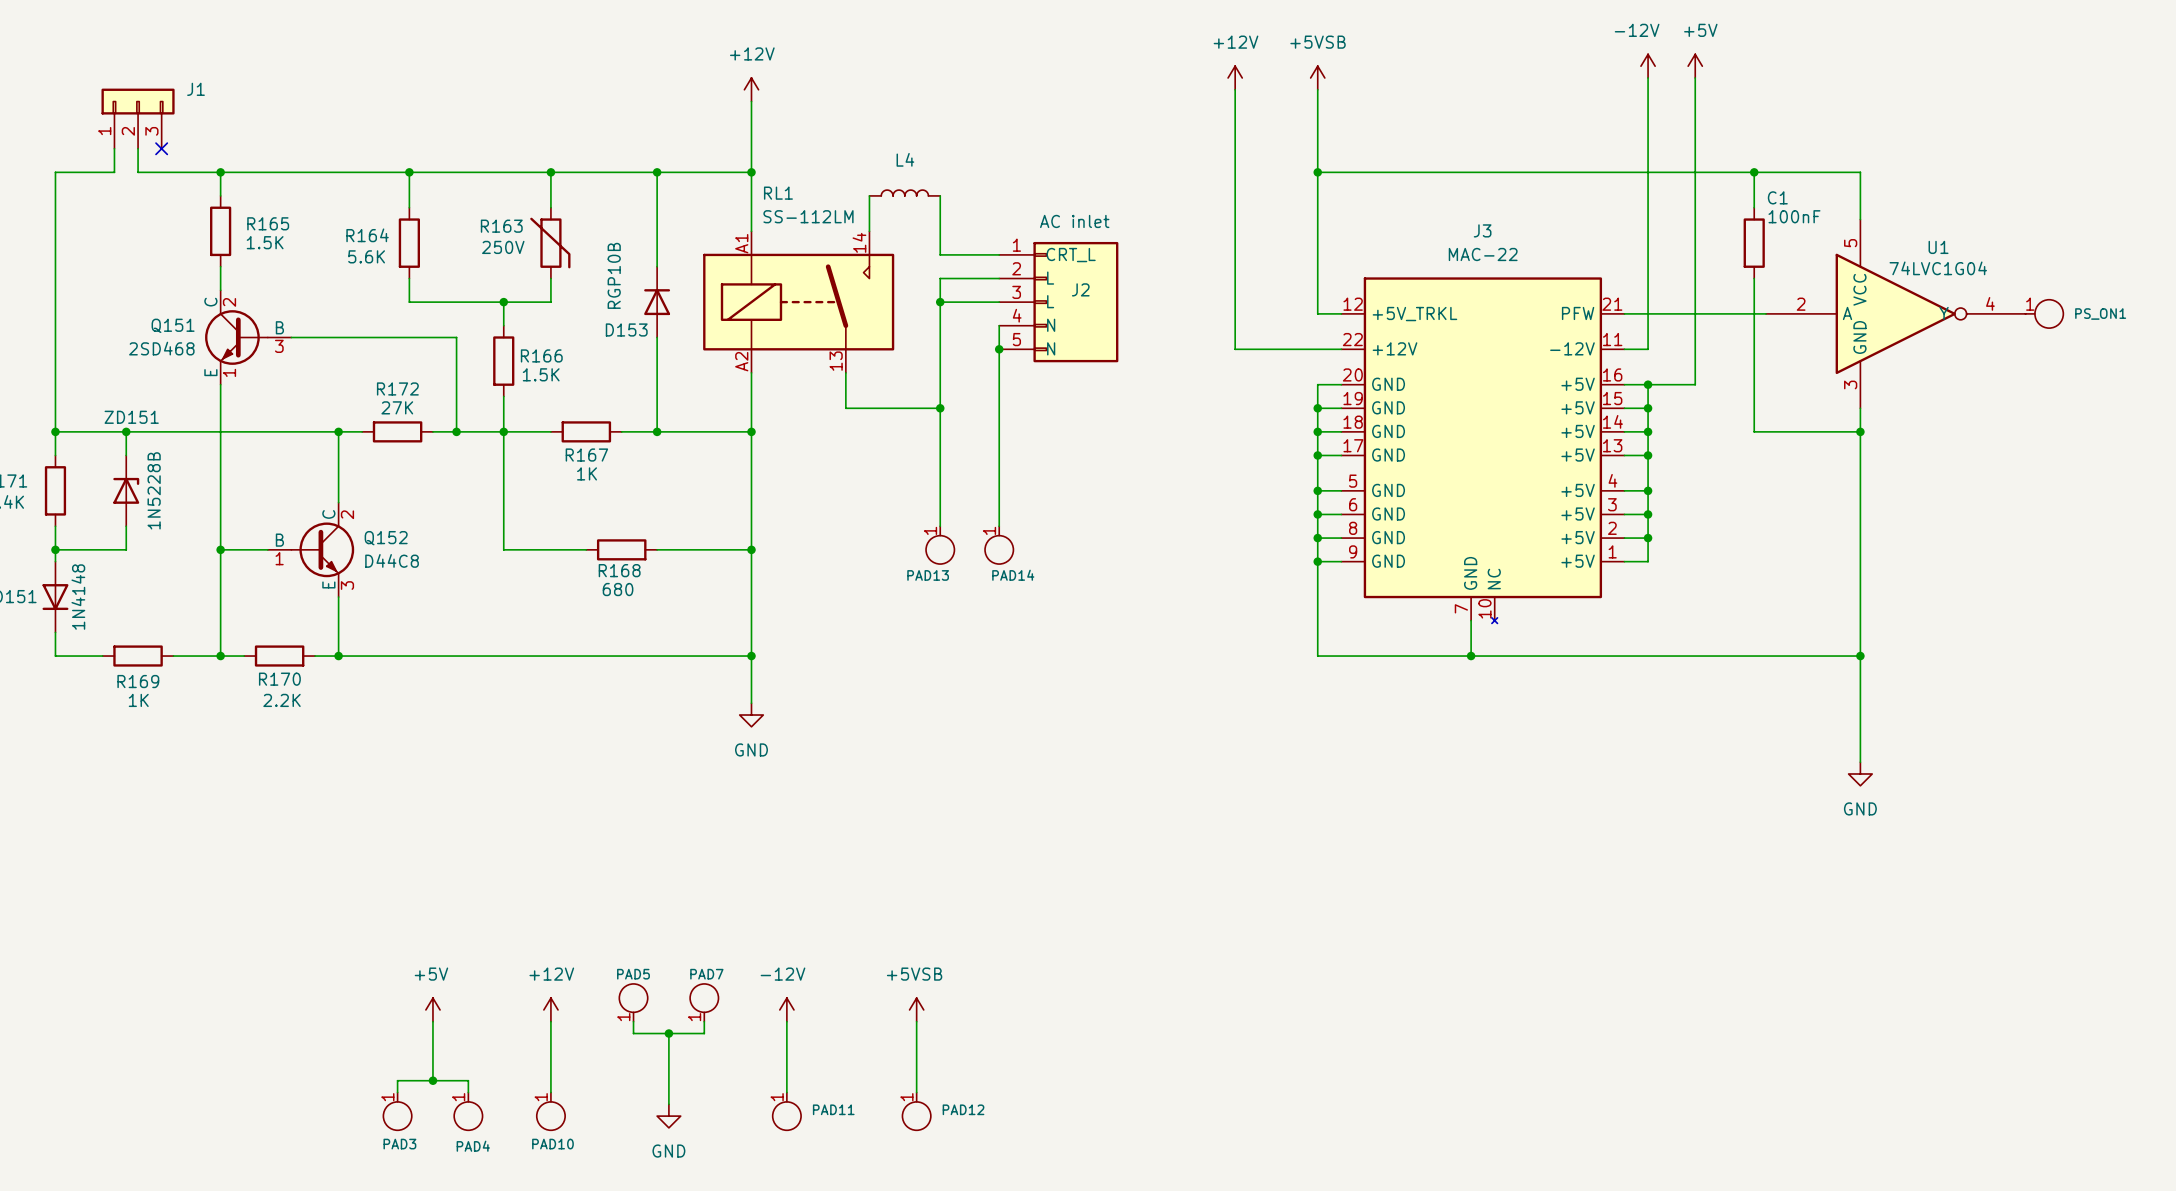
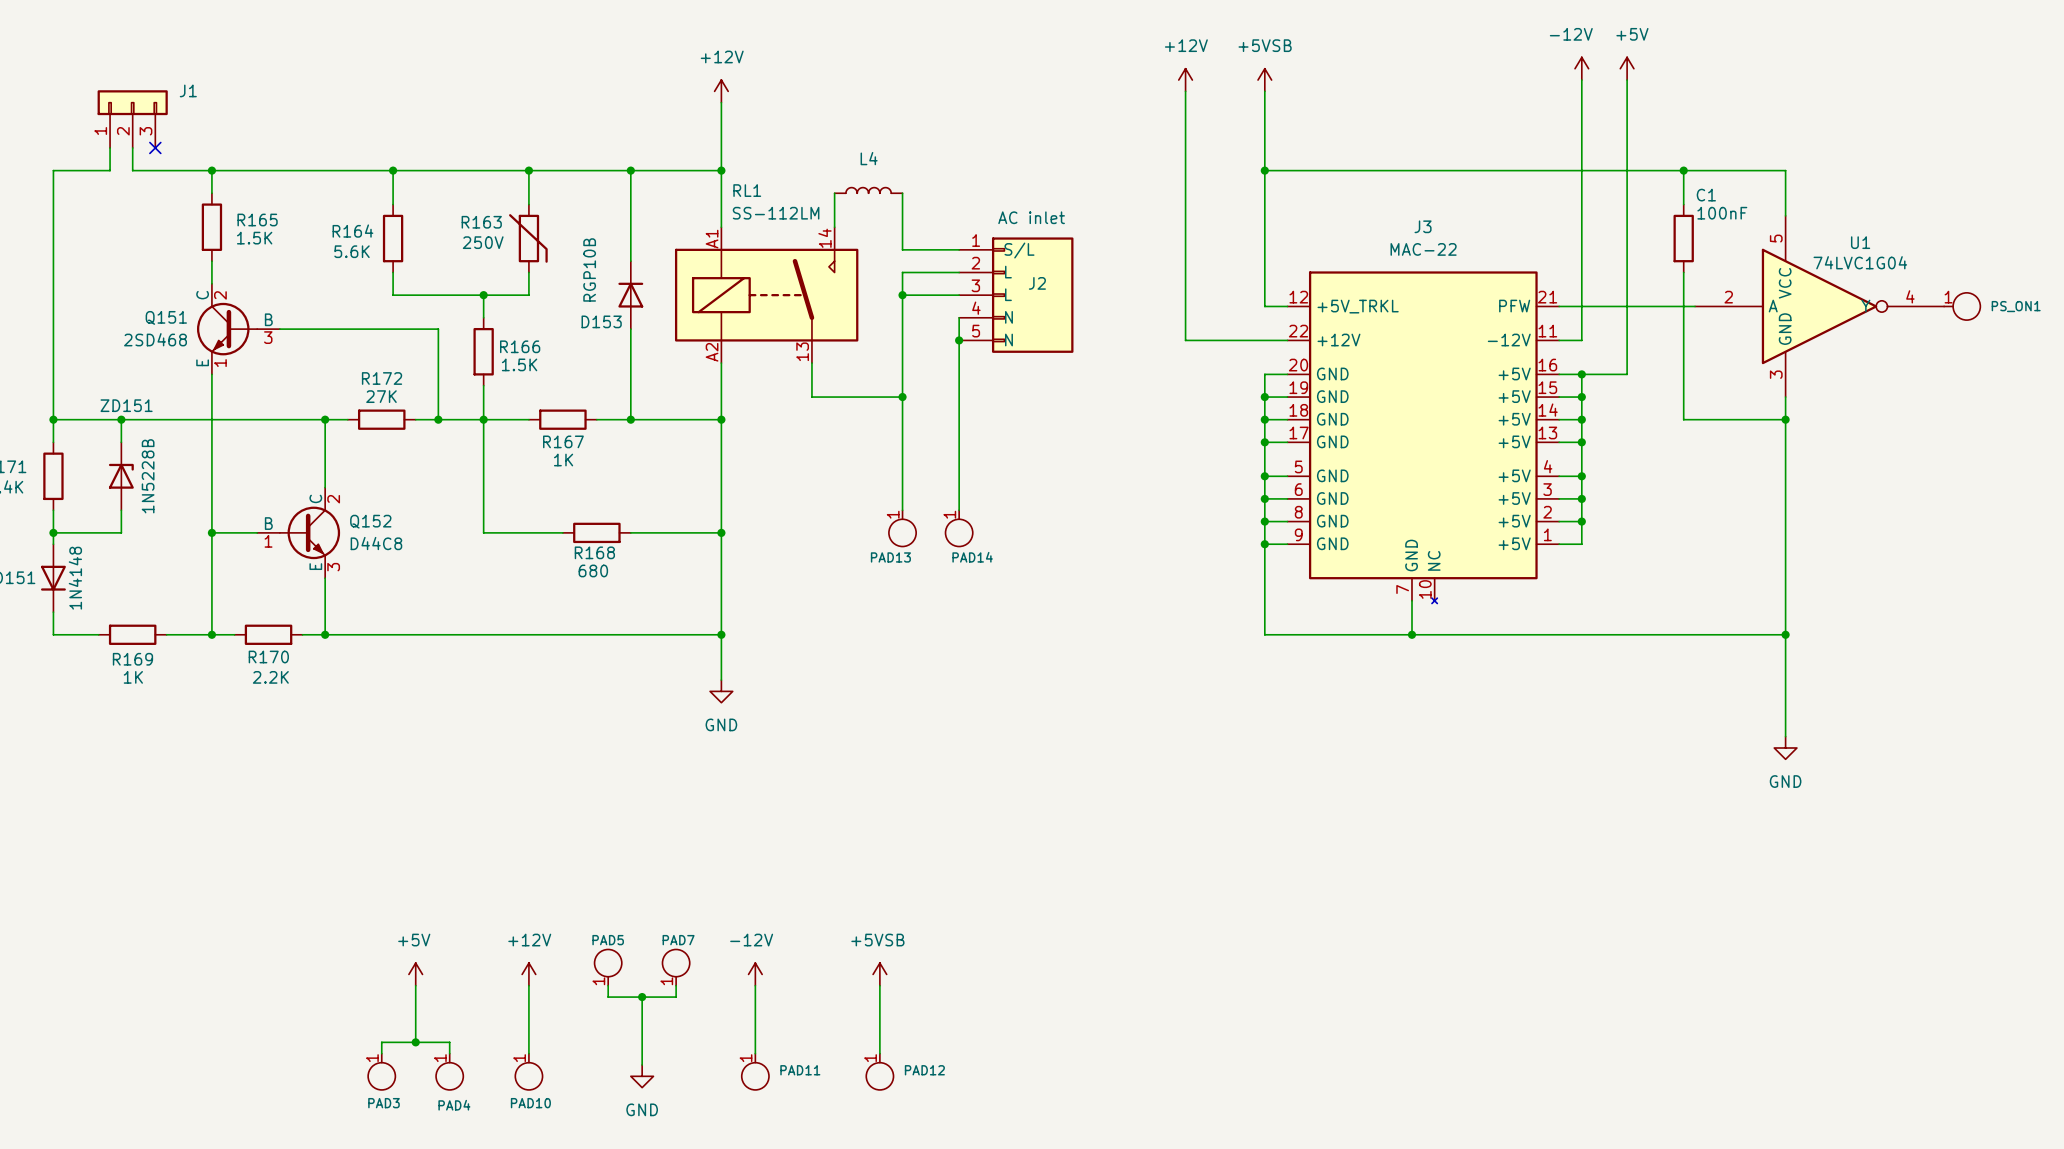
J2 pin name: CRT_L (1071, 255) -> S/L (1019, 250)

